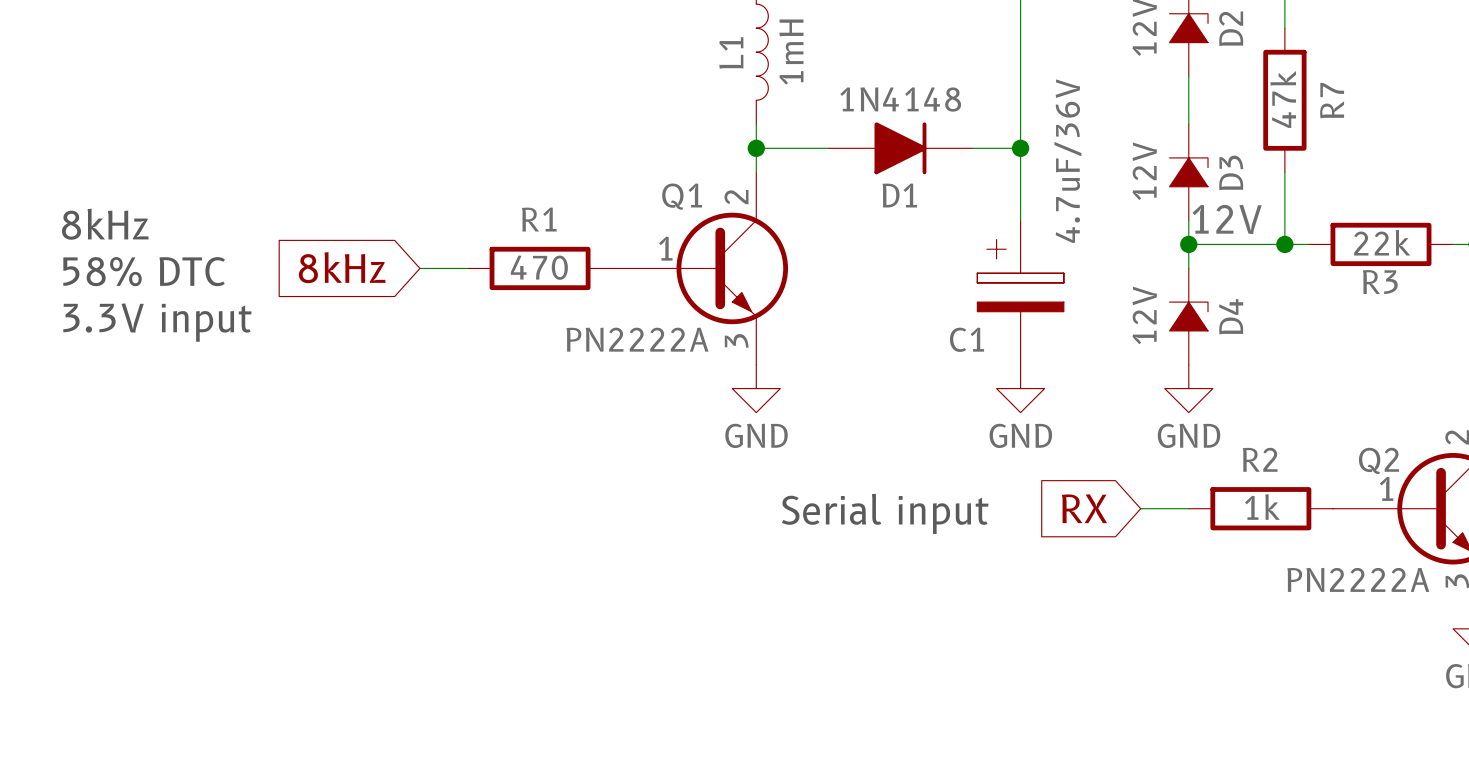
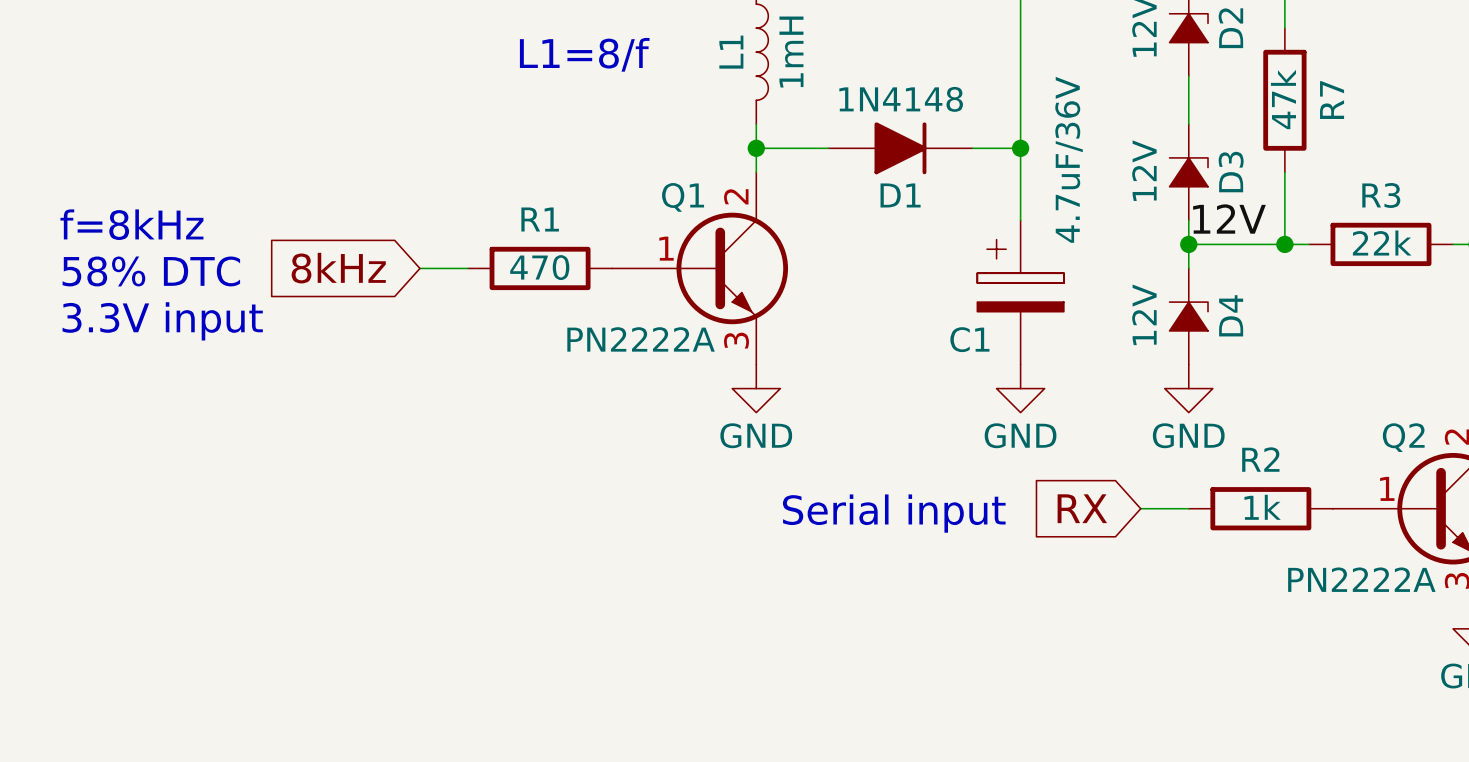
text: none -> L1=8/f (584, 54)
text: 8kHz (105, 224) -> f=8kHz (131, 224)
R3 name position: R3 (1380, 282) -> R3 (1381, 195)
Q2 name position: Q2 (1378, 460) -> Q2 (1403, 437)

